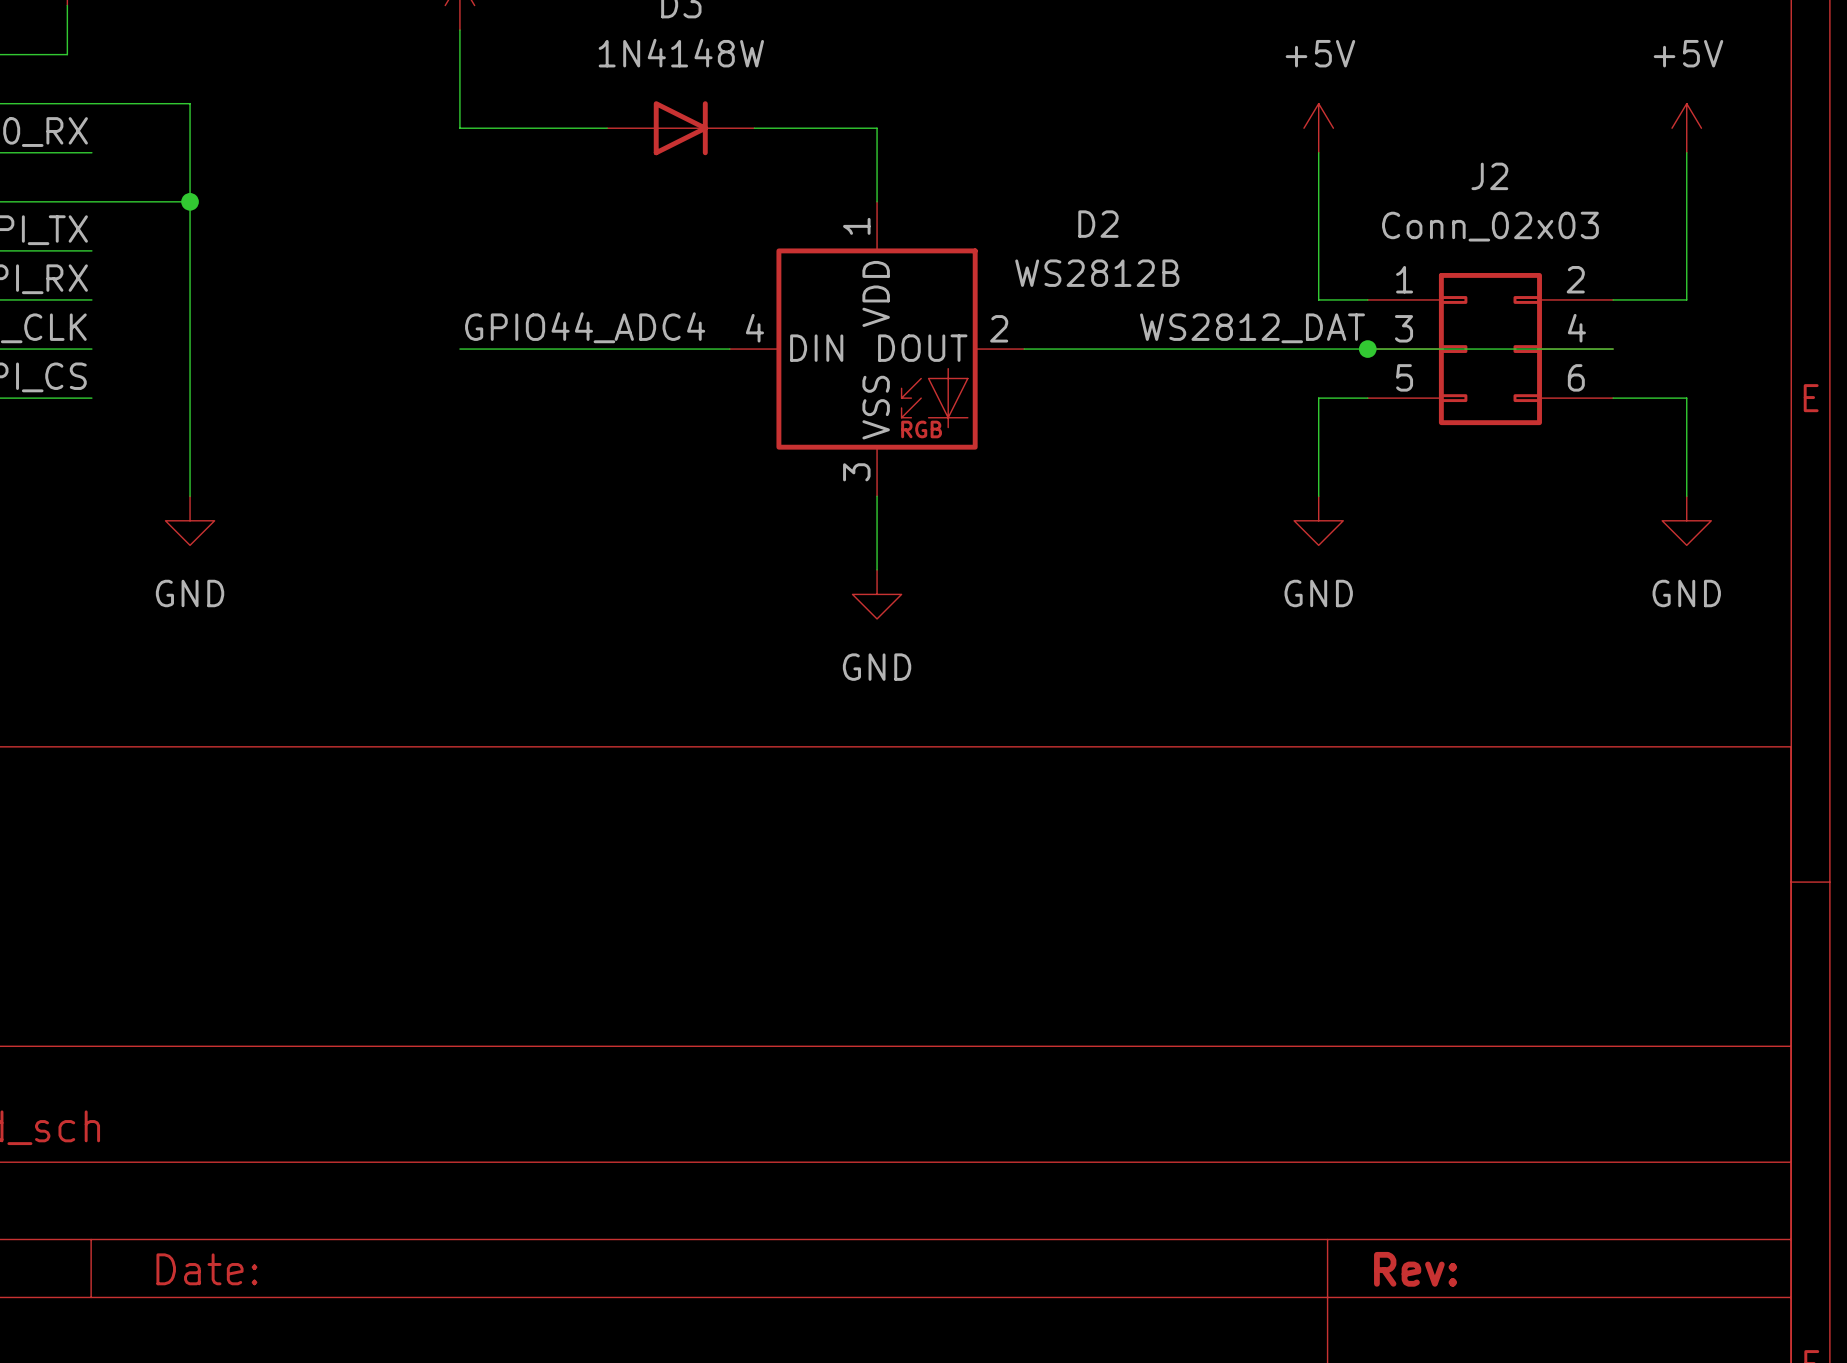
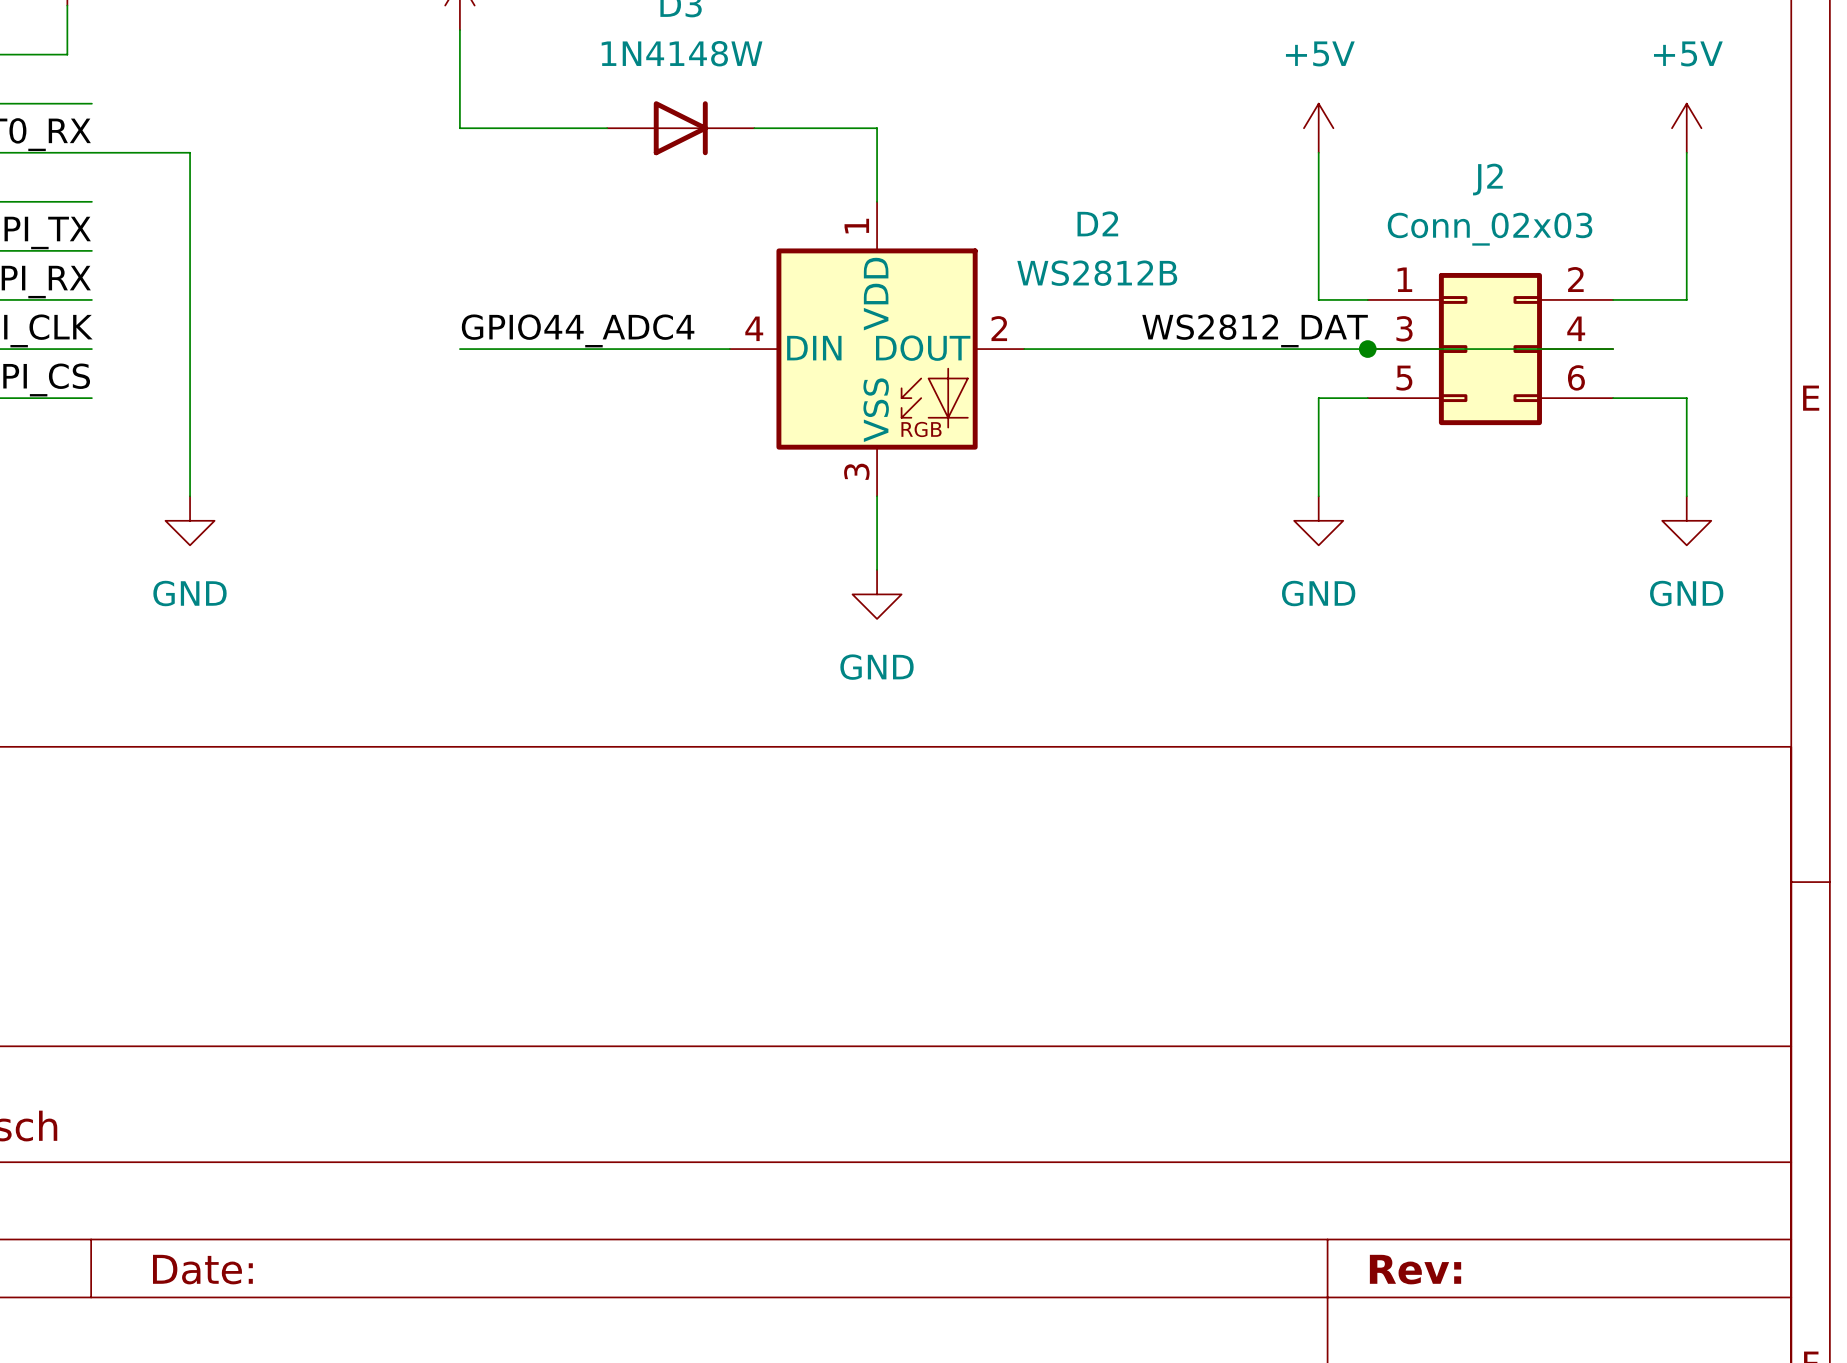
wire: (91, 103) (190, 103) (190, 152) -> (91, 152) (190, 152)
wire: (91, 201) (190, 201) -> none
junction: (190, 201) -> none

